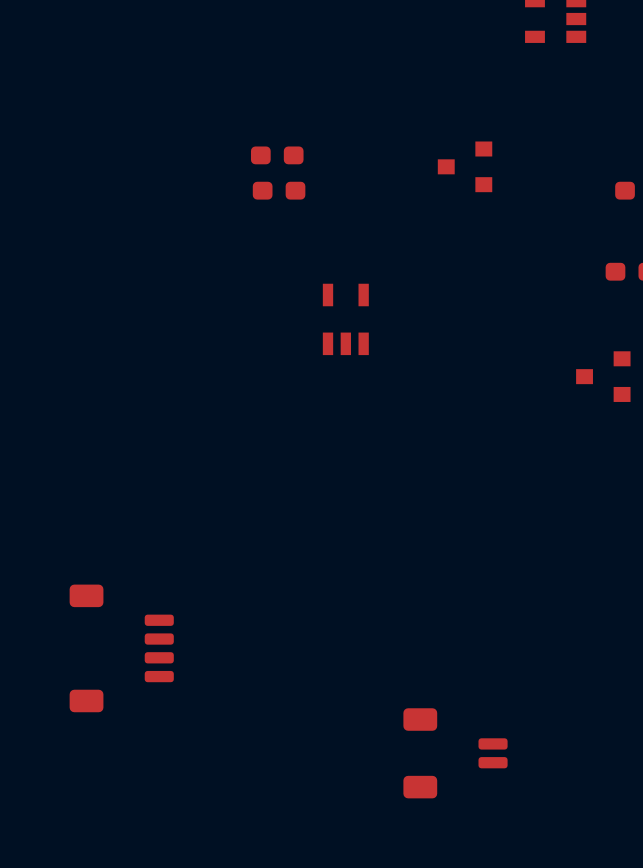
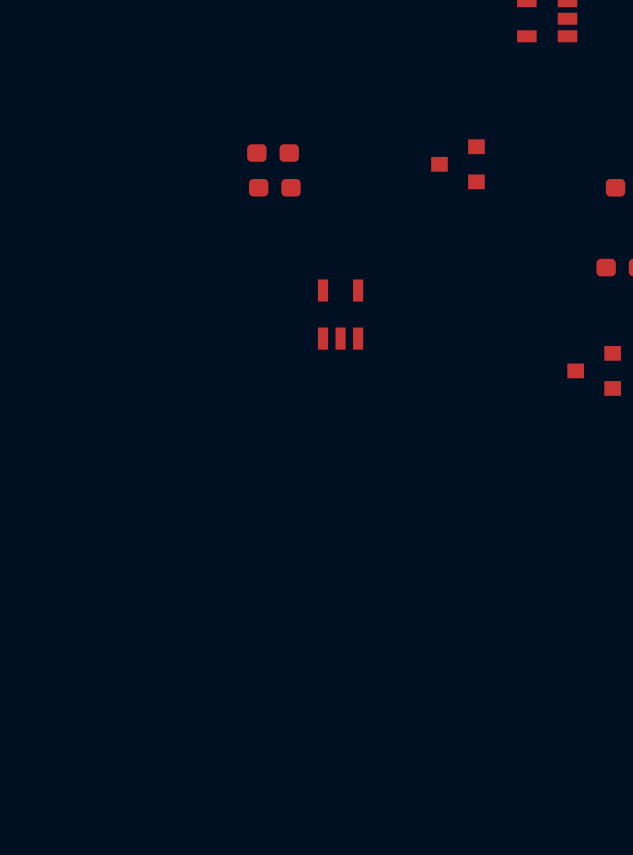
part: (121, 648) -> none
part: (455, 753) -> none

